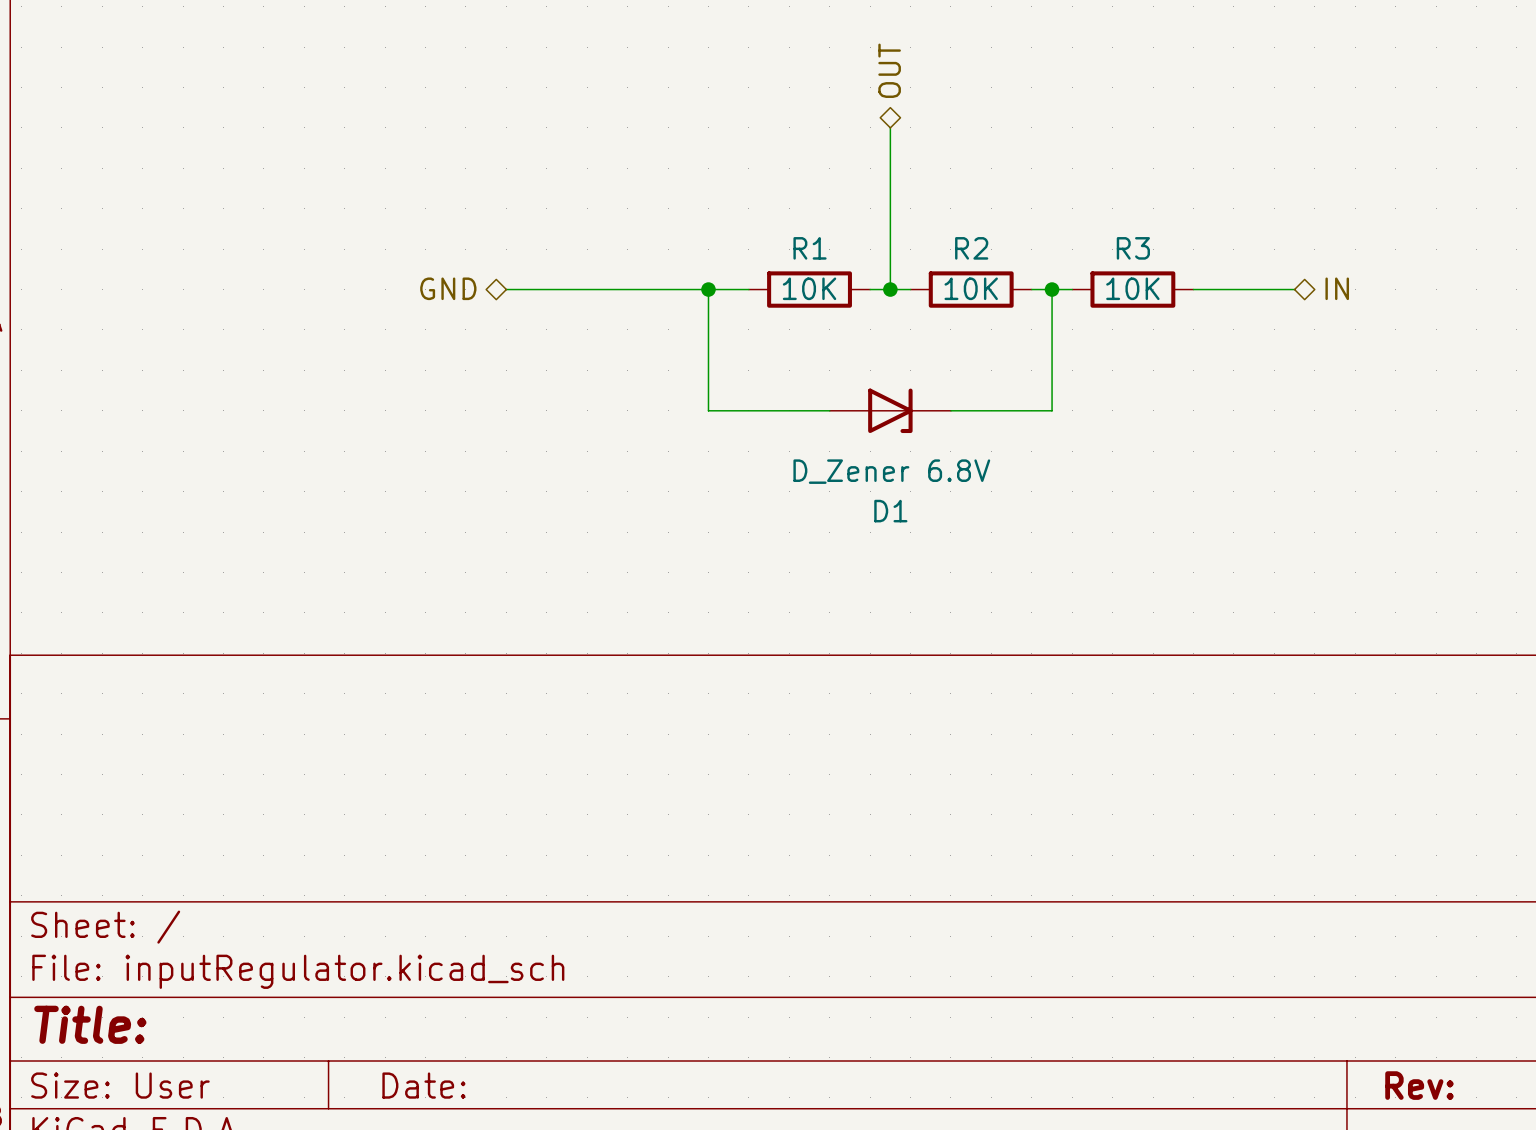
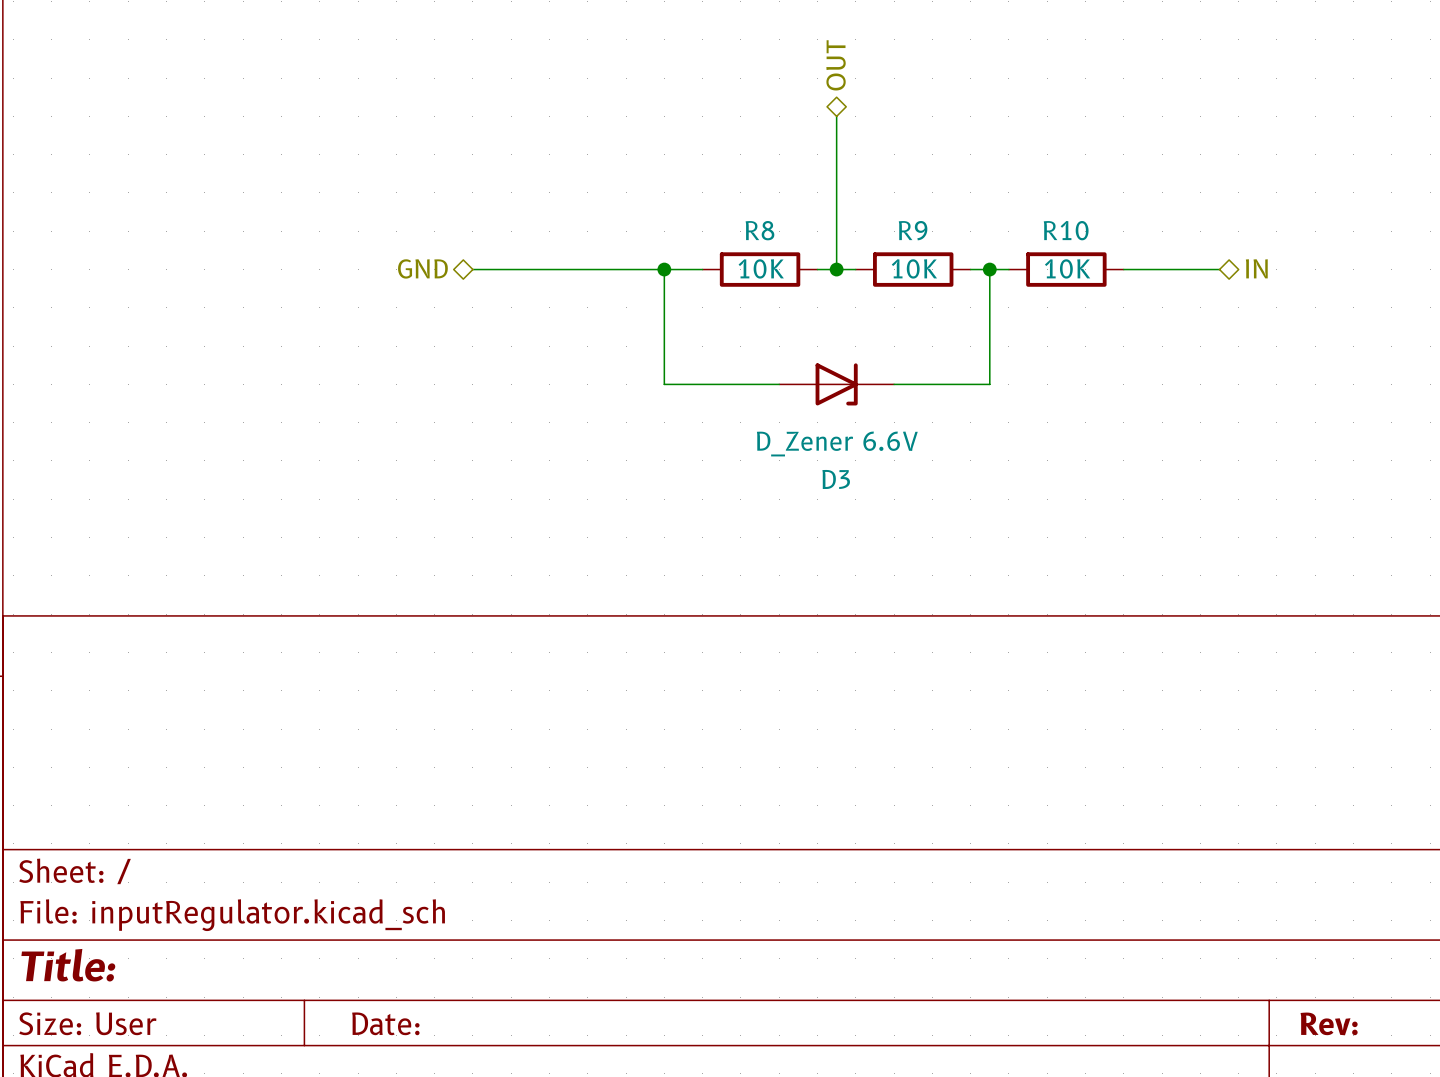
R1 name: R1 (810, 248) -> R8 (759, 230)
R2 name: R2 (971, 248) -> R9 (913, 230)
R3 name: R3 (1133, 248) -> R10 (1066, 230)
D1 value: D_Zener 6.8V (891, 471) -> D_Zener 6.6V (837, 443)
D1 name: D1 (890, 511) -> D3 (836, 479)

